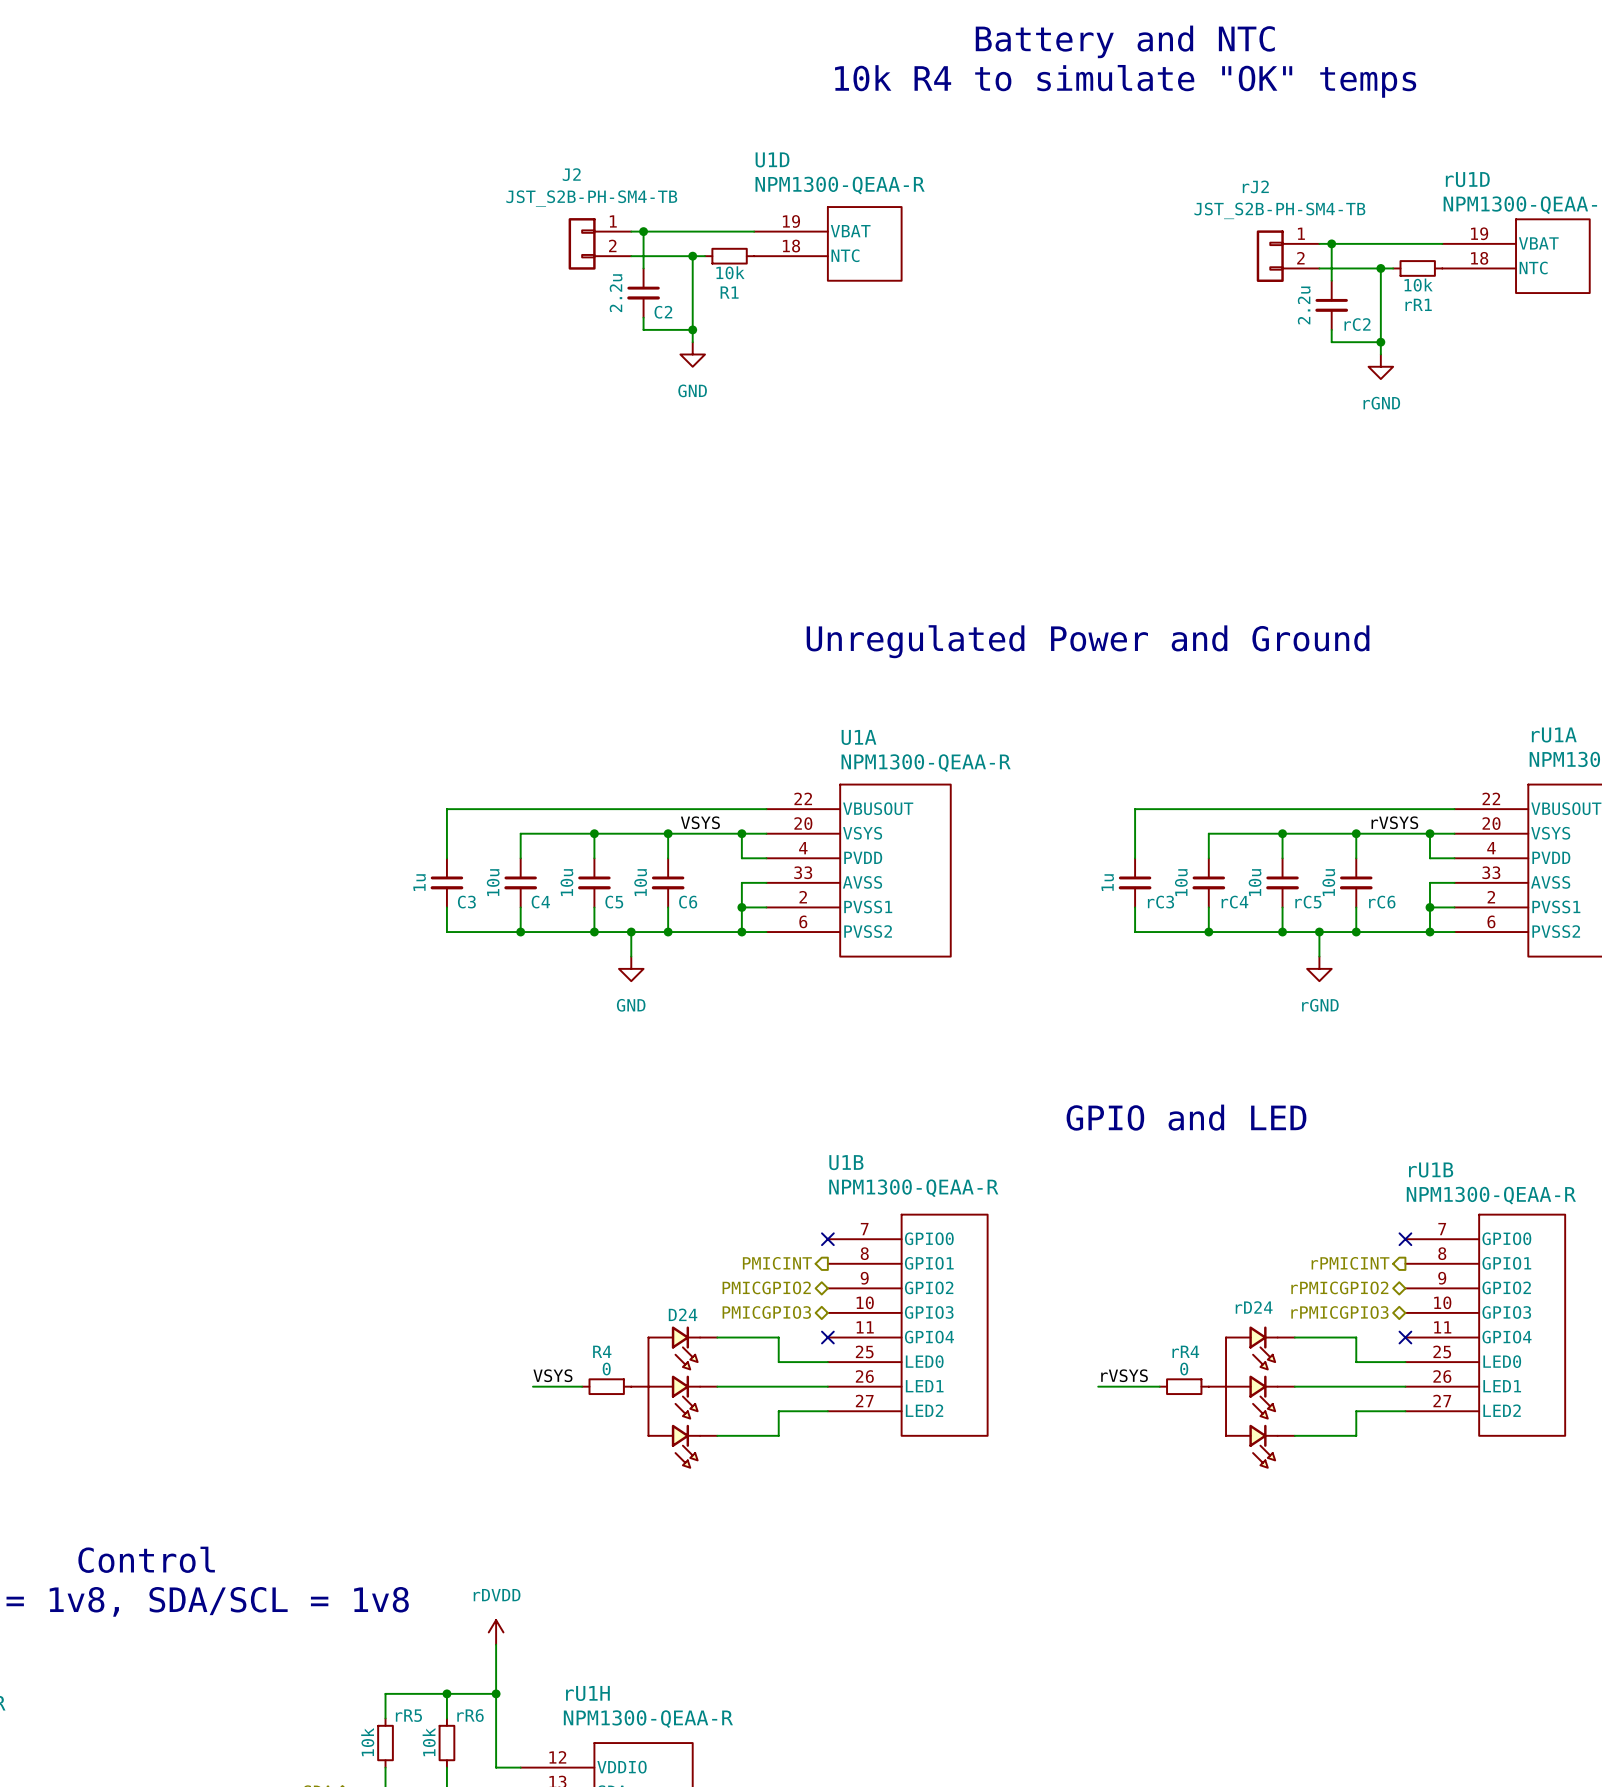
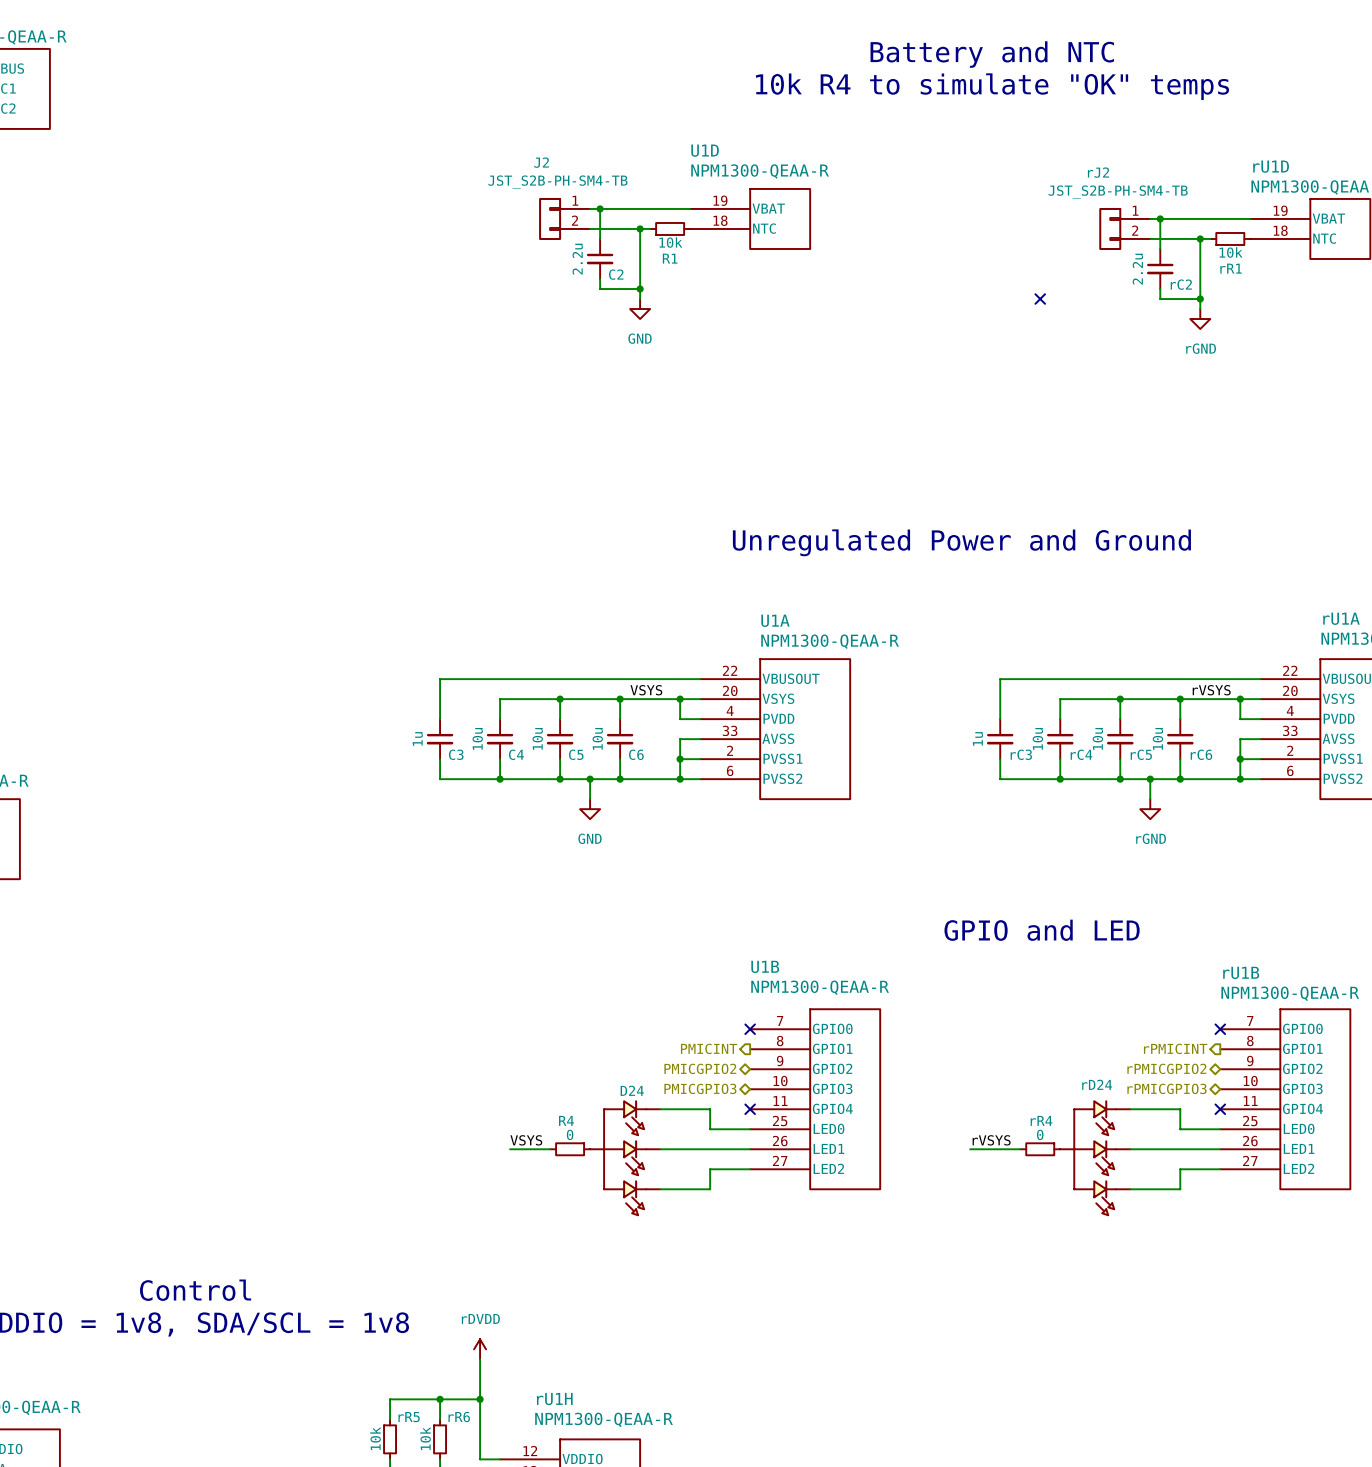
no-connect mark: none -> (1040, 299)

